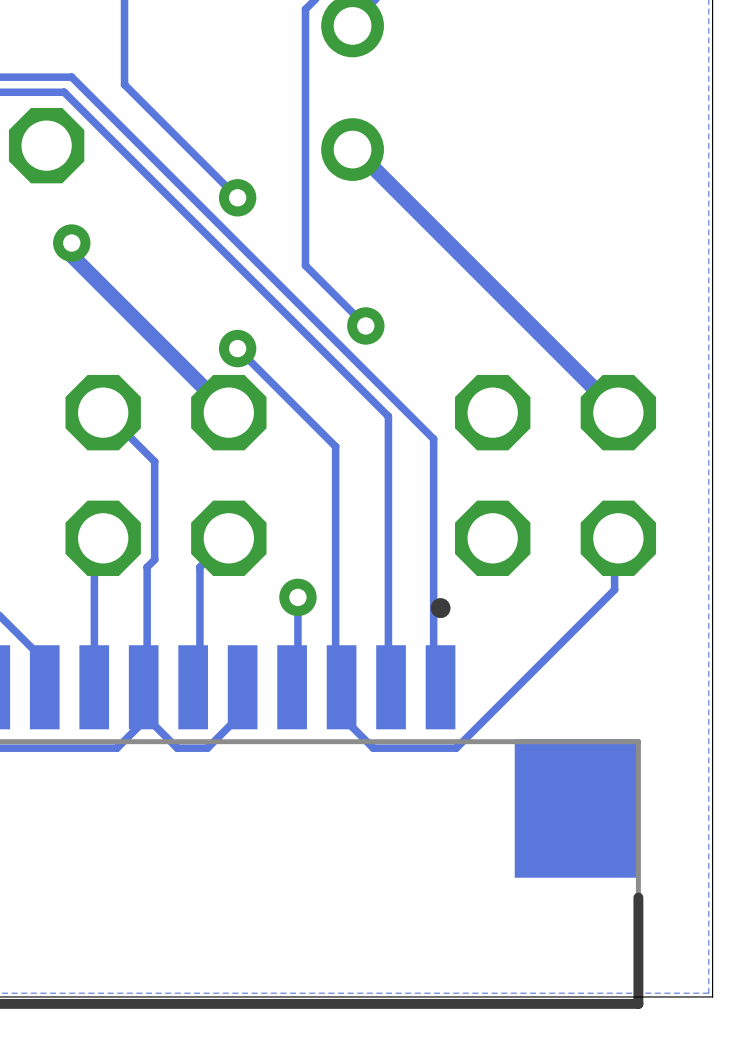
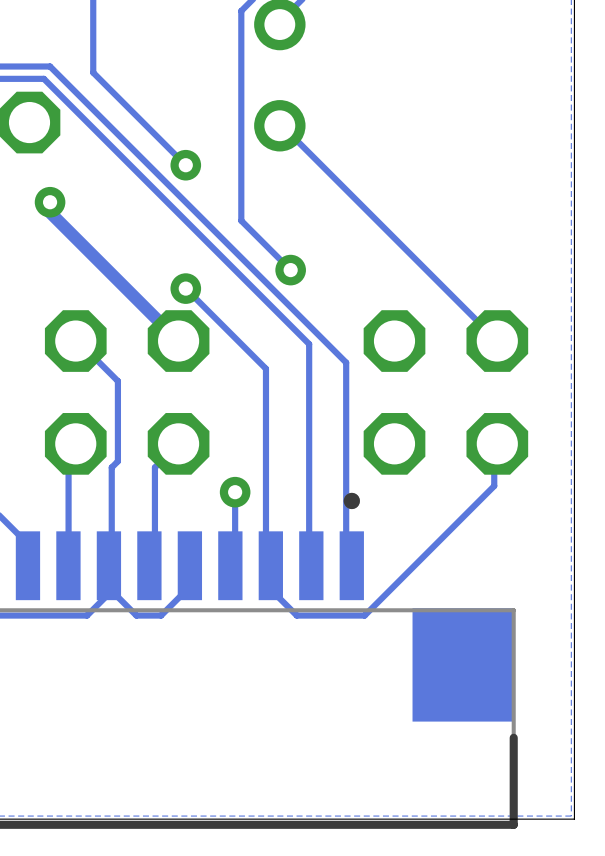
track width: thick (363, 158) (614, 408) -> thin (289, 132) (494, 337)

